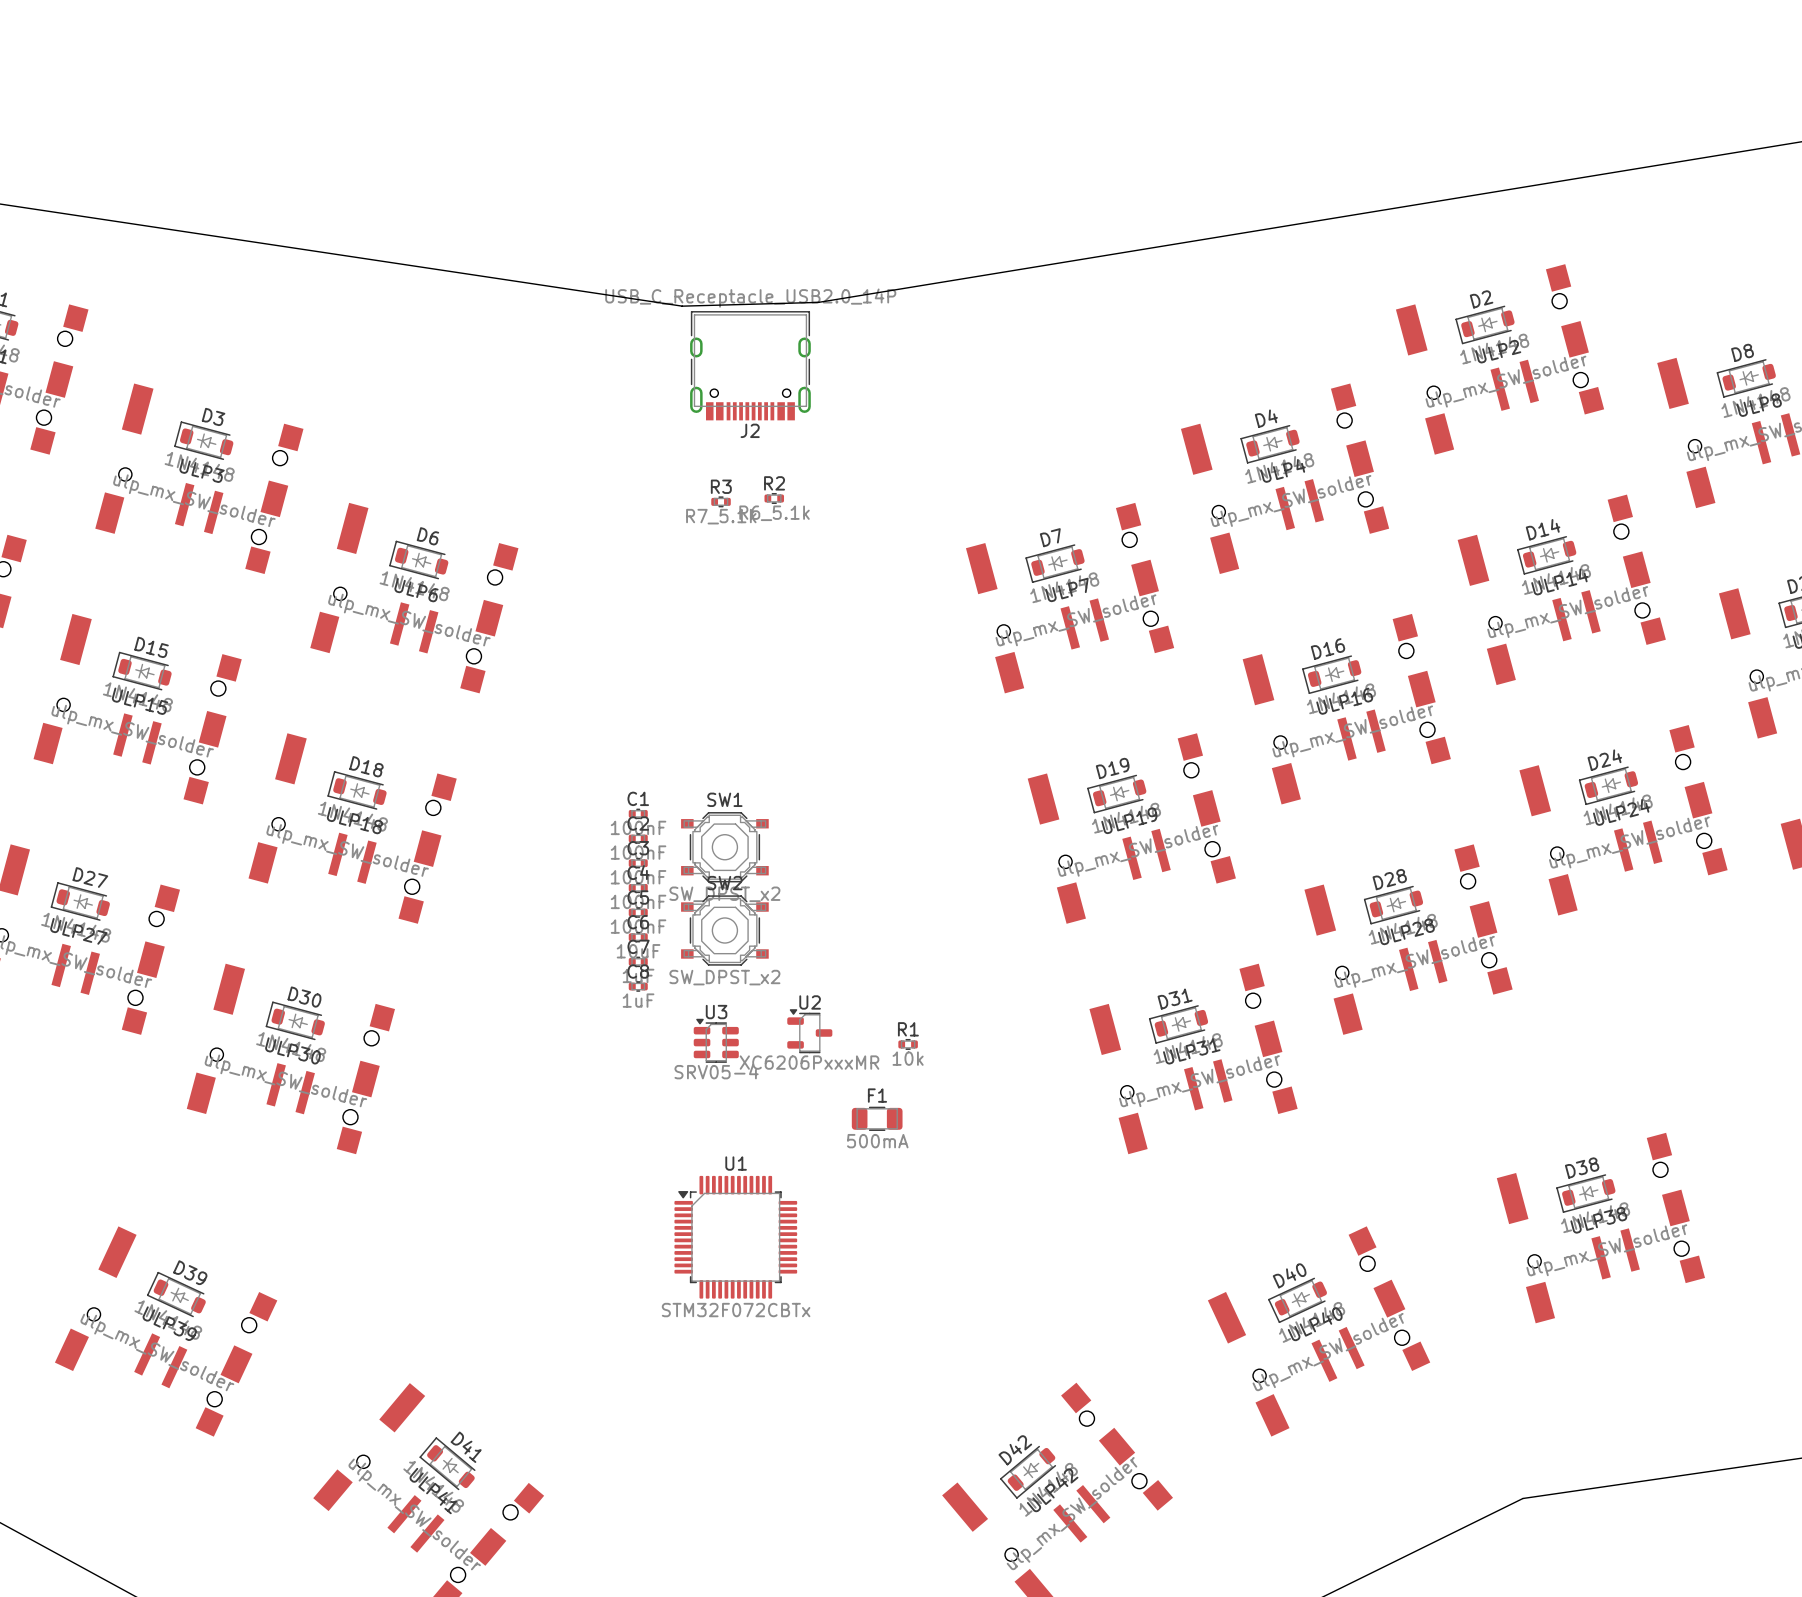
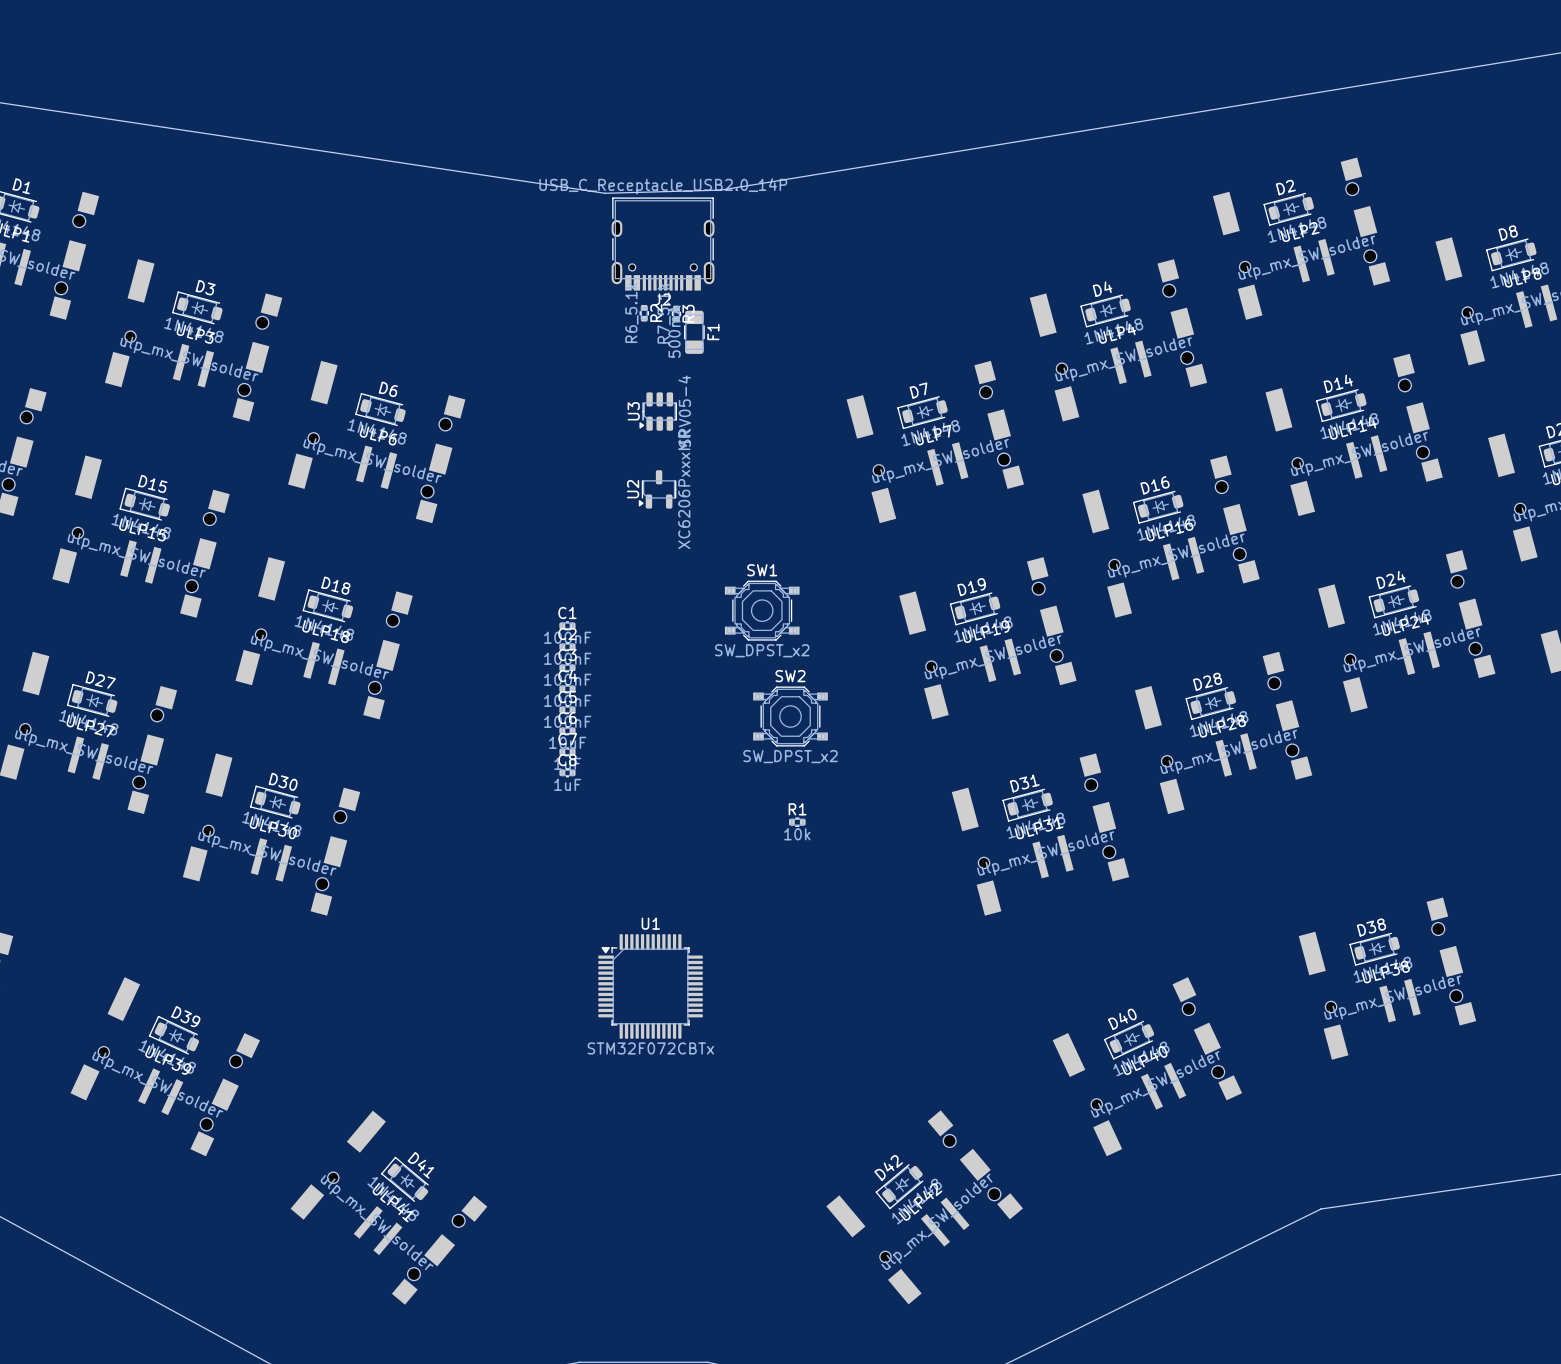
R2 rotation: 0° (774, 498) -> 90° clockwise (644, 313)
R2 position: (774, 498) -> (644, 313)
R3 rotation: 0° (721, 501) -> 90° clockwise (676, 313)
R3 position: (721, 501) -> (676, 313)
SW1 position: (724, 847) -> (762, 610)
SW2 position: (724, 930) -> (790, 716)
U2 rotation: 0° (809, 1031) -> 90° counterclockwise (657, 489)
U2 position: (809, 1031) -> (657, 489)
U3 rotation: 0° (716, 1040) -> 90° counterclockwise (658, 411)
U3 position: (716, 1040) -> (658, 411)
F1 rotation: 0° (877, 1118) -> 90° clockwise (694, 332)
F1 position: (877, 1118) -> (694, 332)

